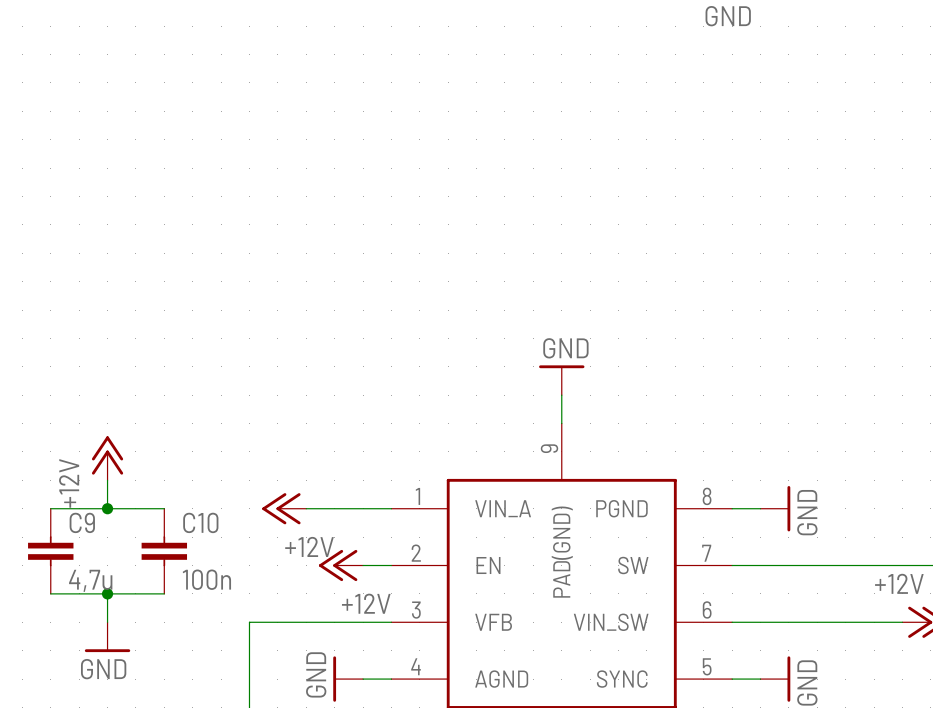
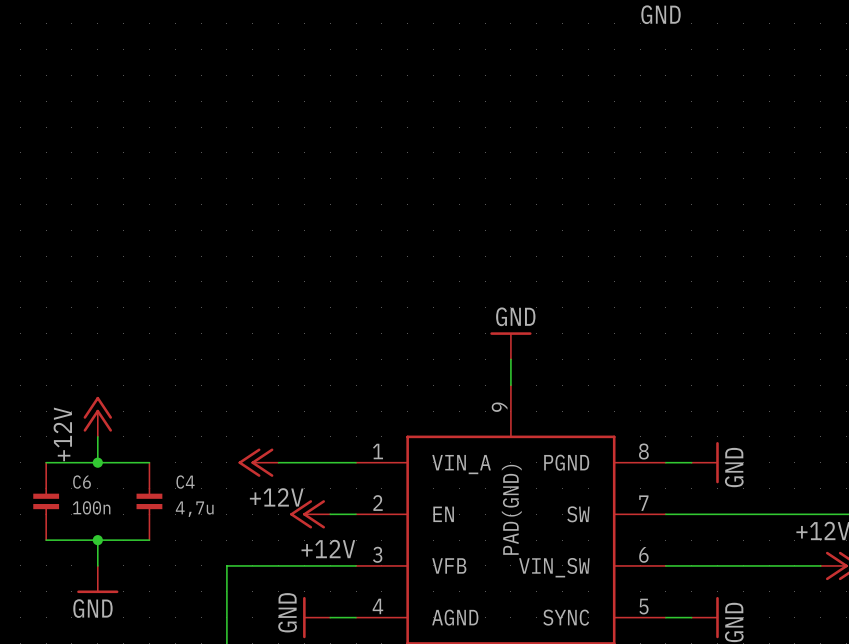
C9: 4,7u (50, 551) -> none
C6: none -> 100n (46, 501)
C10: 100n (164, 551) -> none
C4: none -> 4,7u (149, 501)

